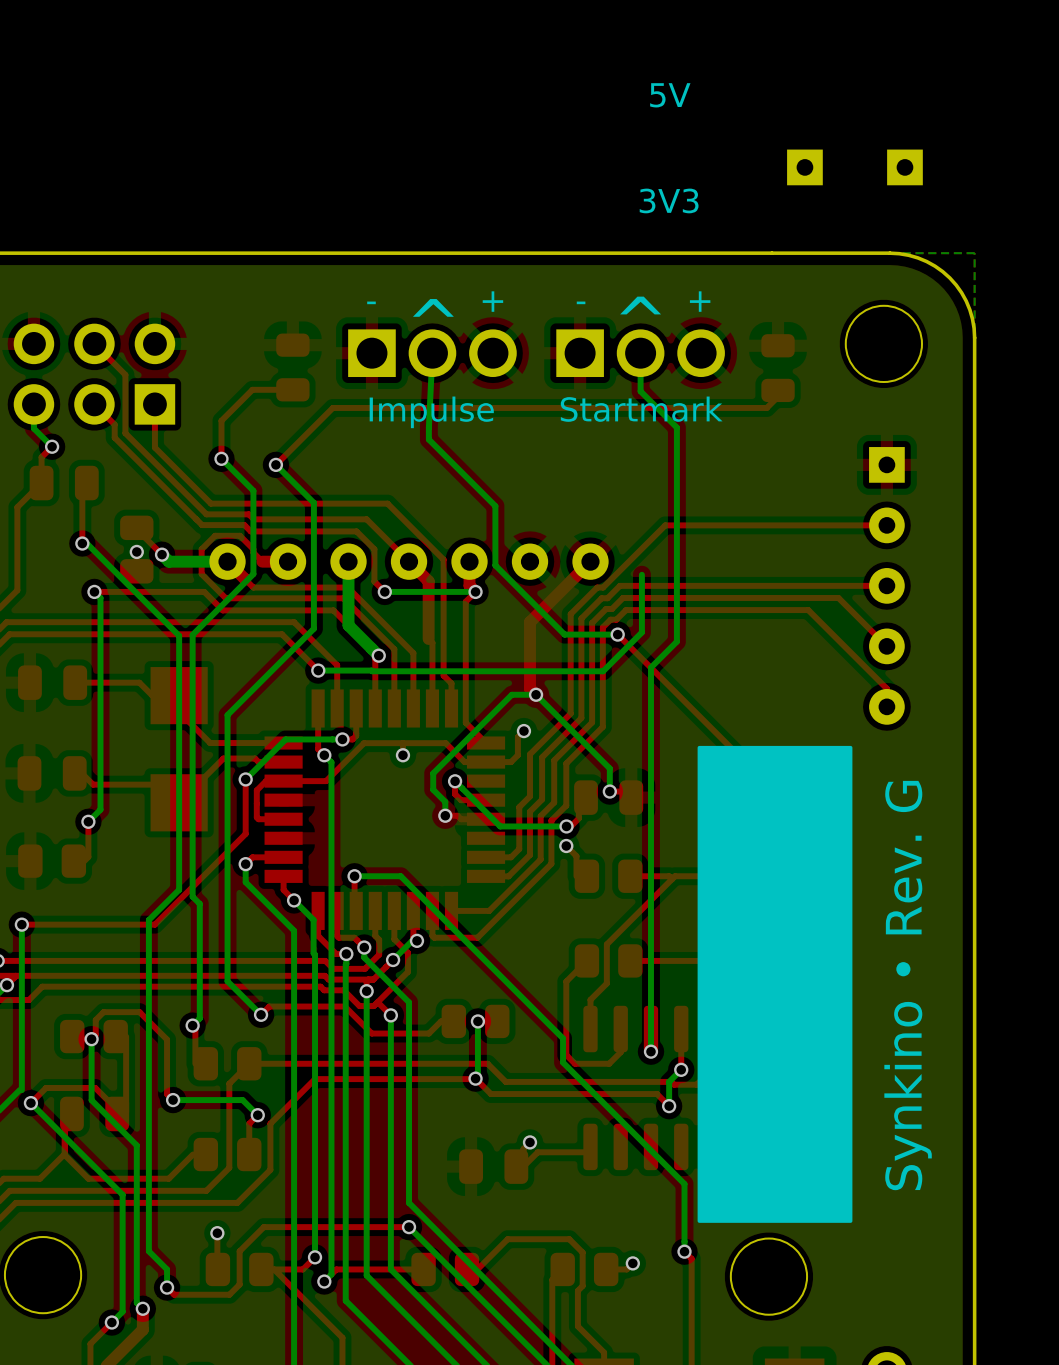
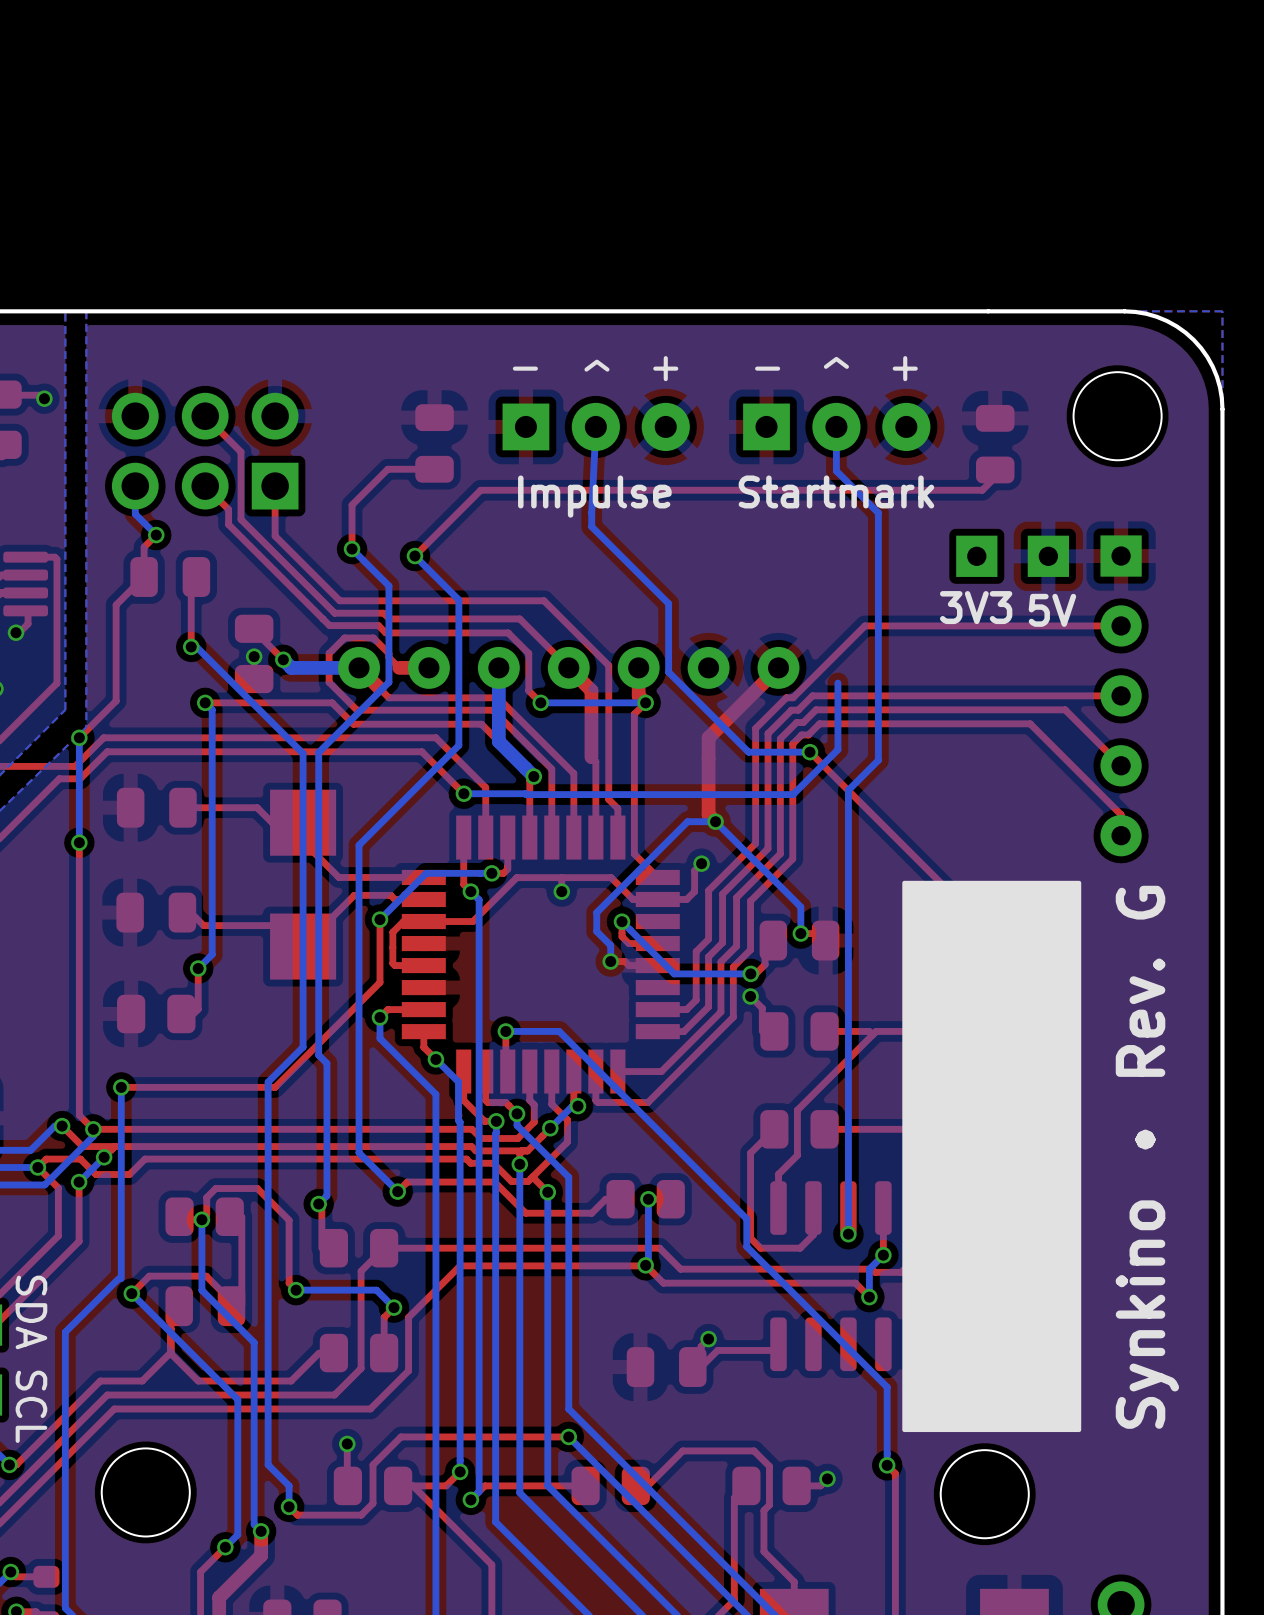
text position: 5V (670, 95) -> 5V (1052, 610)
part: (804, 167) -> none
part: (904, 167) -> none
text position: 3V3 (669, 200) -> 3V3 (976, 607)
part footprint: [348, 329, 517, 378] -> [502, 402, 690, 452]
part footprint: [556, 329, 725, 378] -> [743, 402, 931, 452]
part: none -> (976, 556)
part: none -> (1048, 556)

